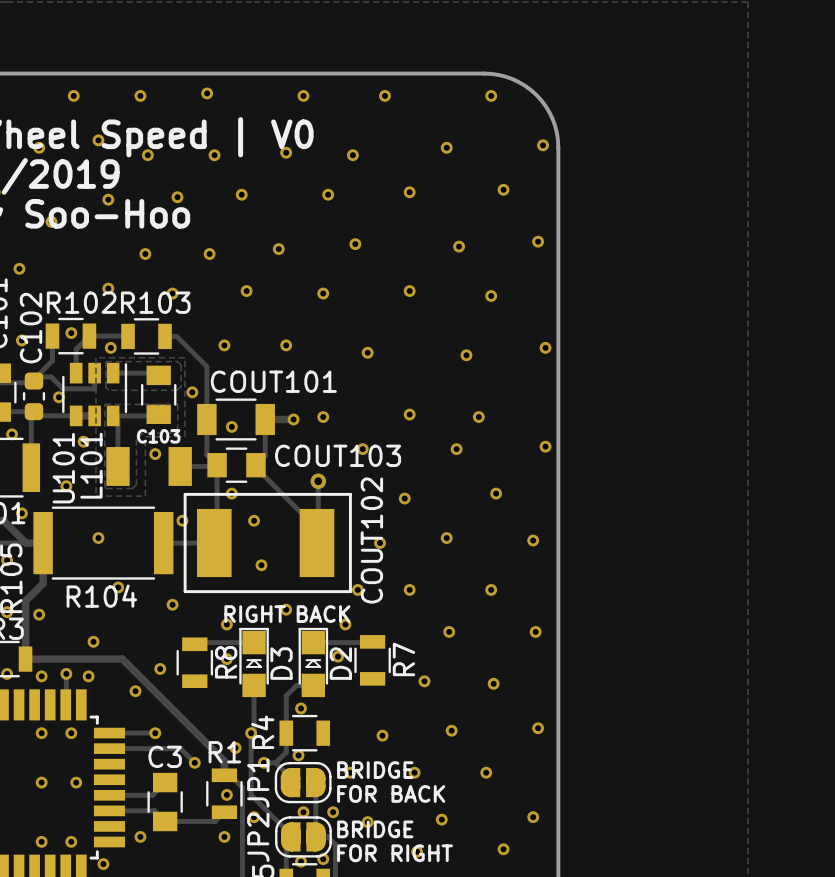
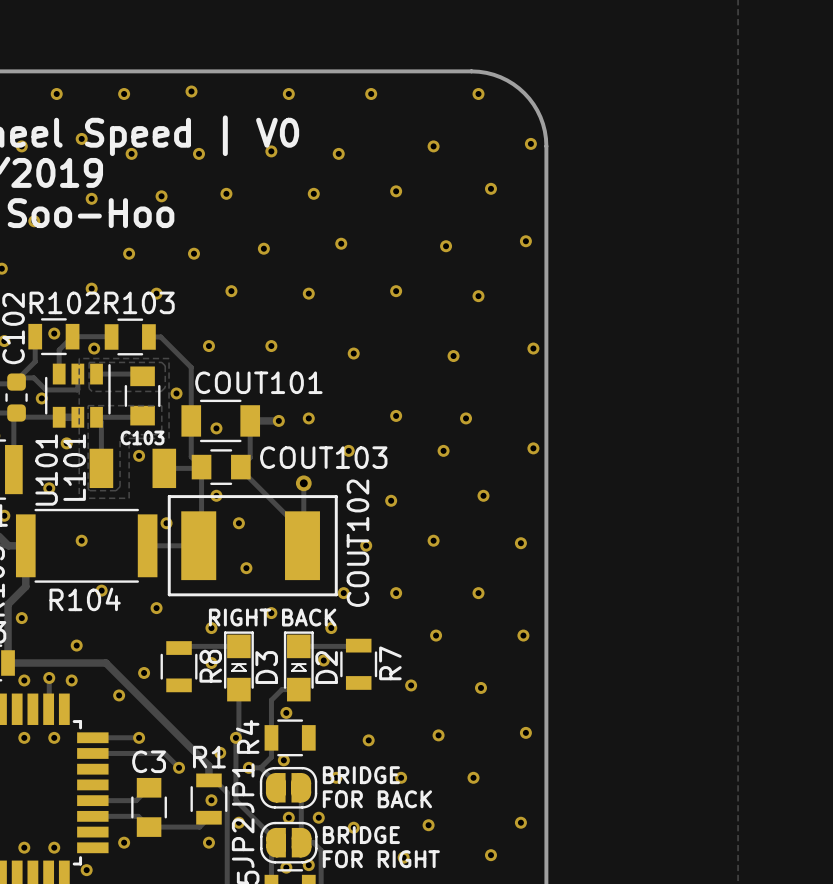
via: (41, 782) -> none
via: (76, 782) -> none

